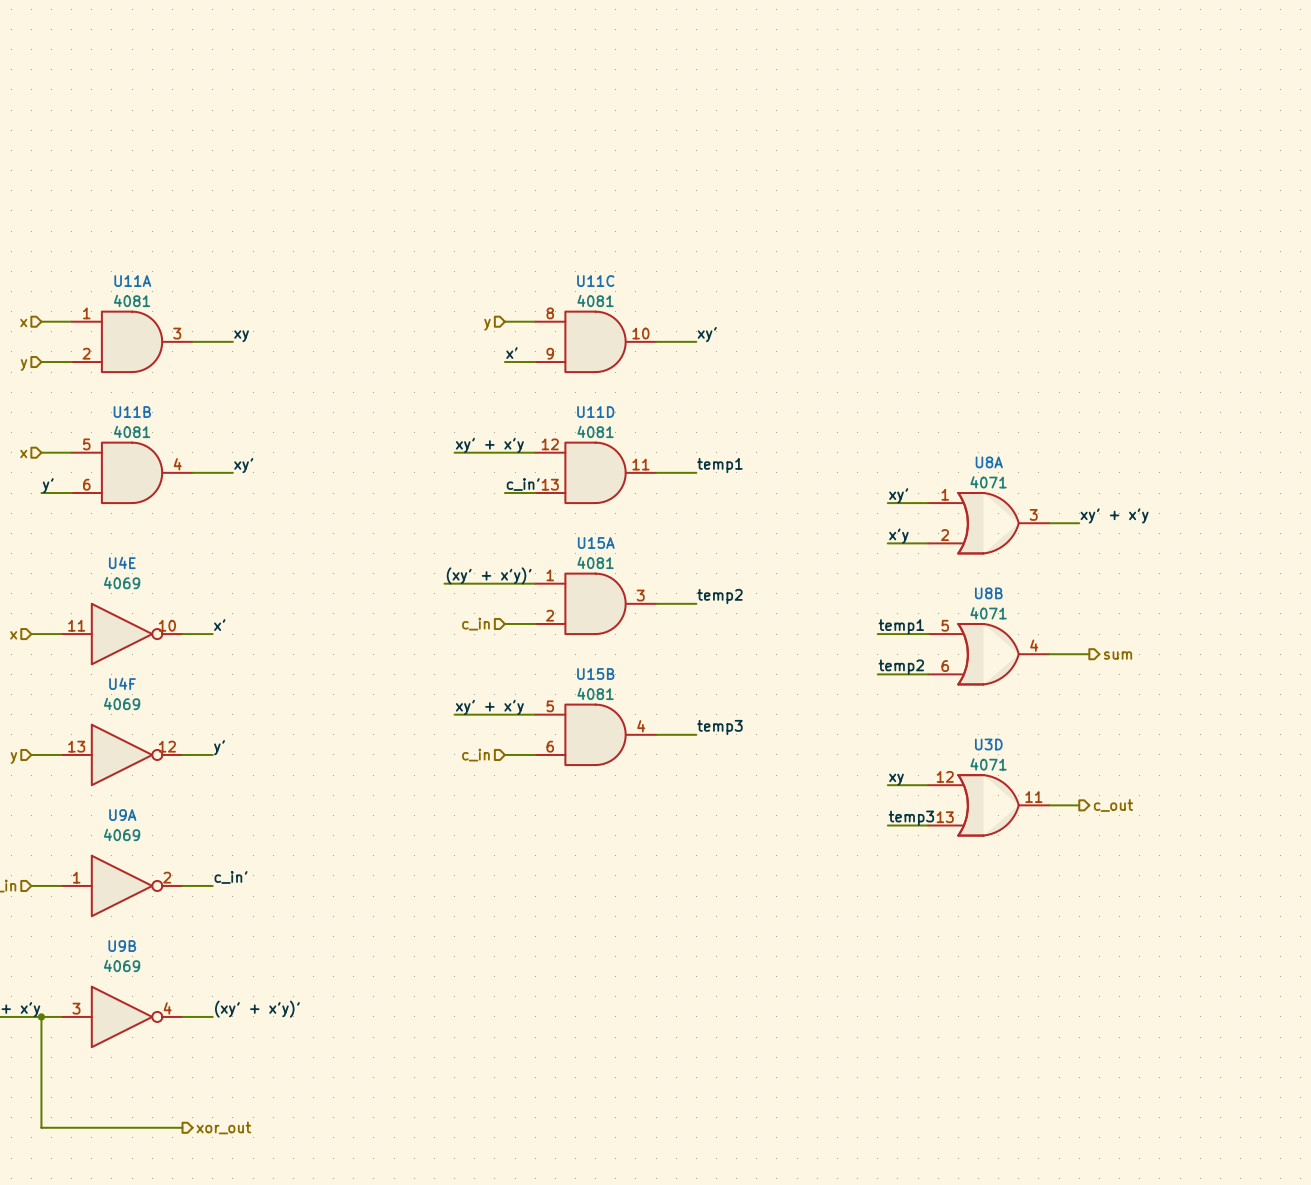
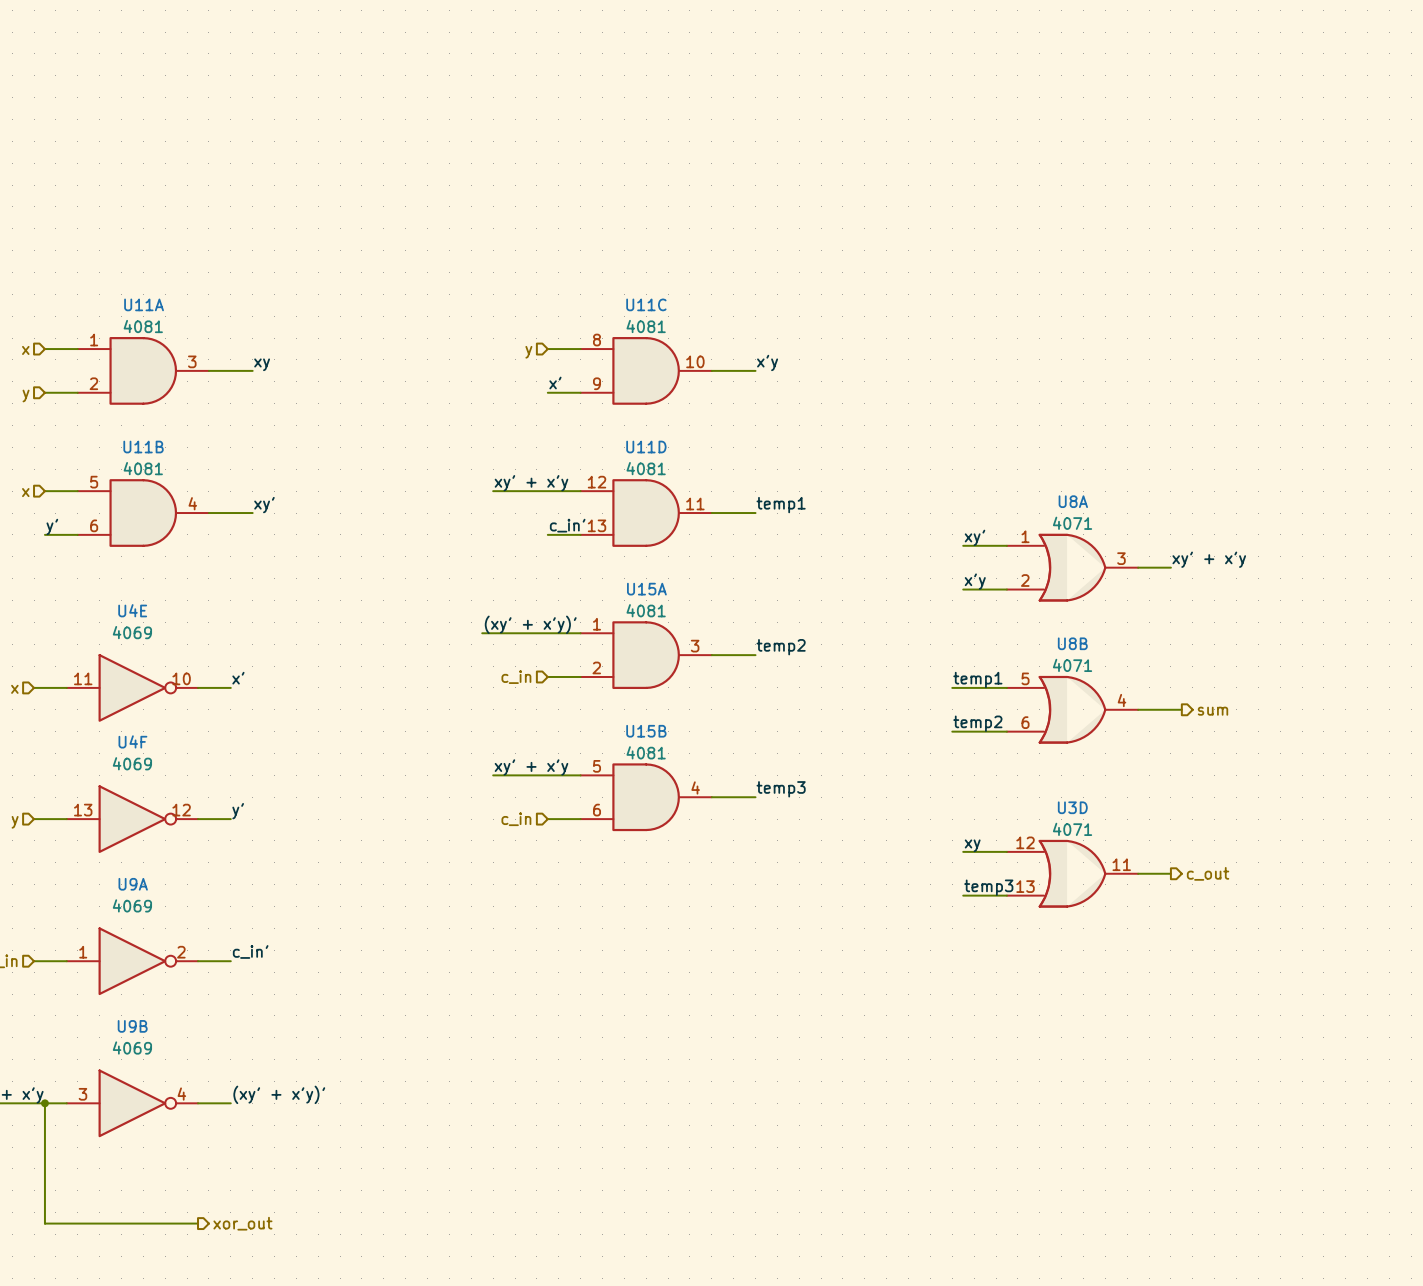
label: xy' (707, 334) -> x'y (767, 362)

